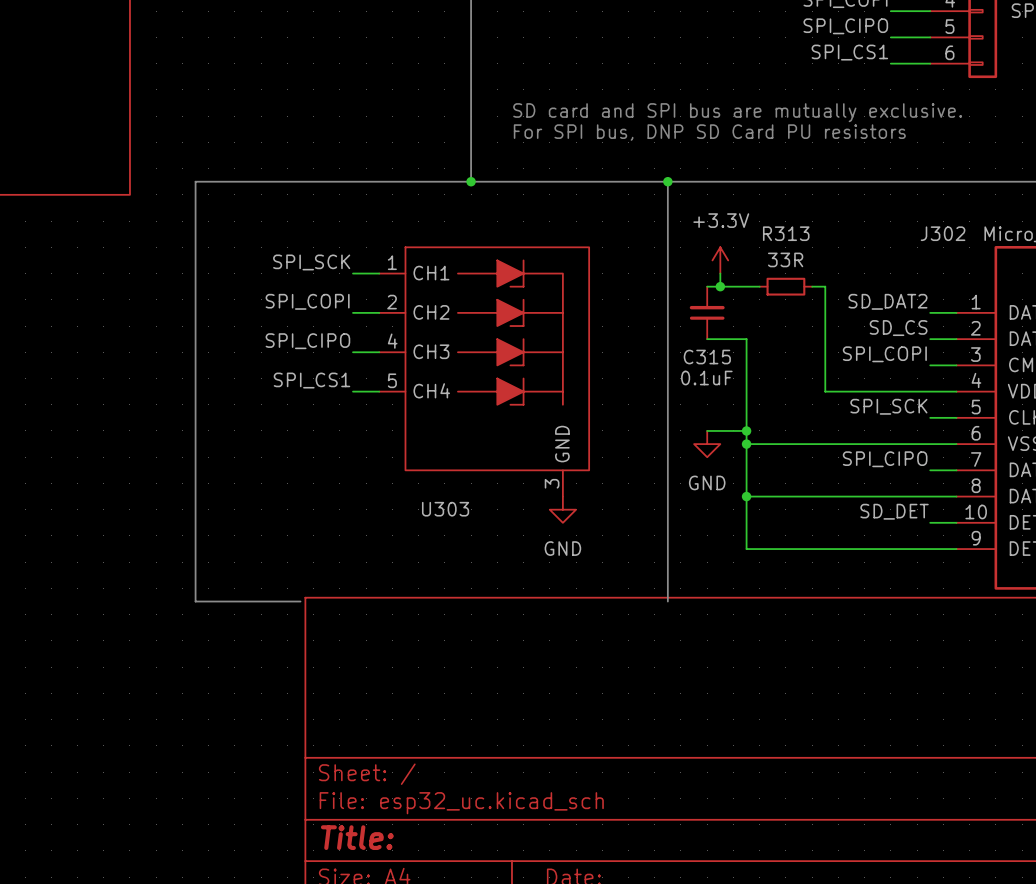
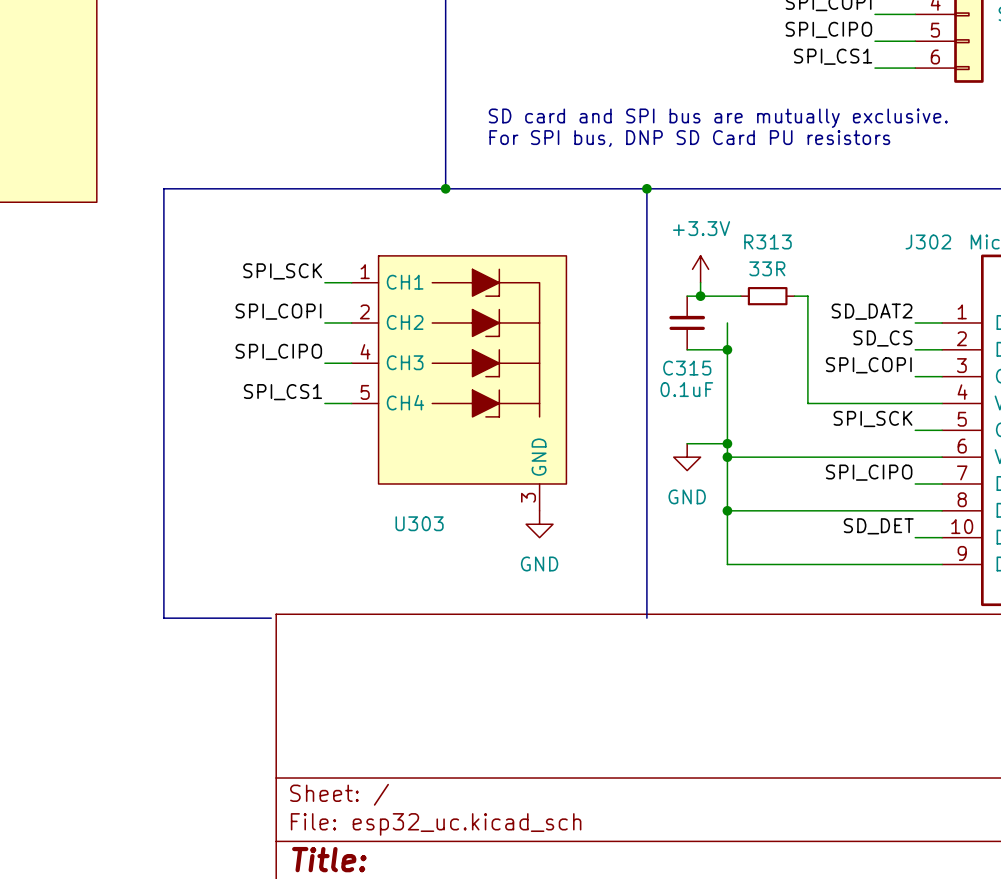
wire: none -> (727, 322) (727, 349)
junction: none -> (727, 349)

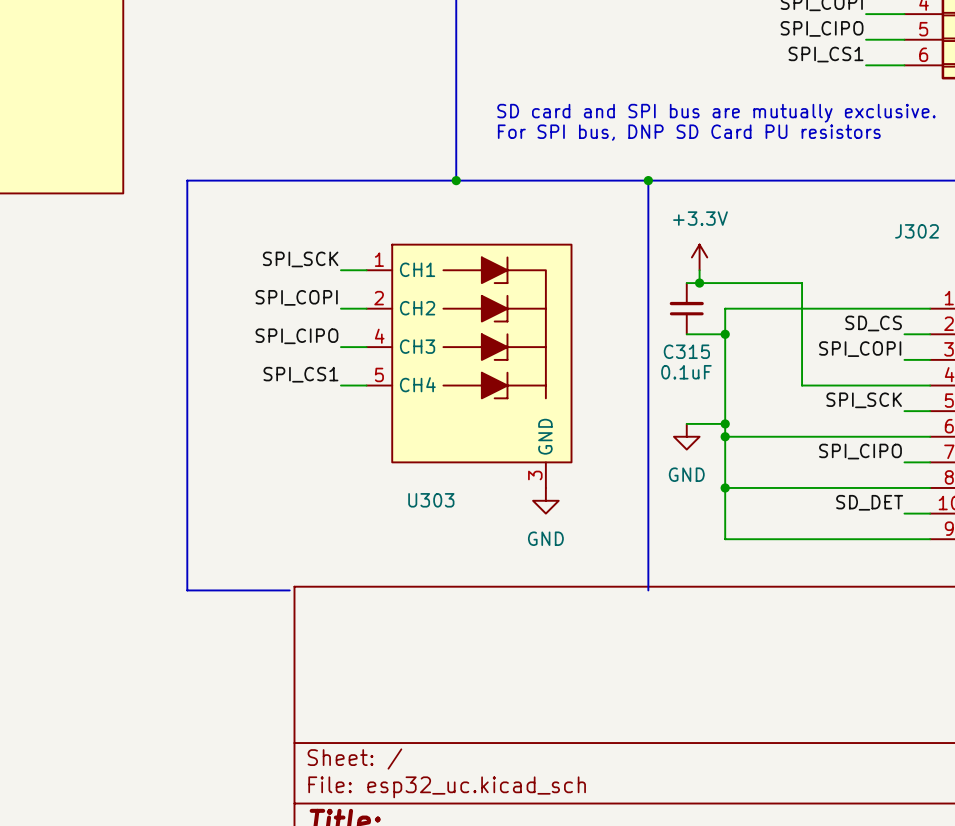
wire: none -> (738, 283) (789, 283)
R313: 33R (767, 296) -> none
label: SD_DAT2 (872, 311) -> none
wire: none -> (725, 308) (904, 308)

